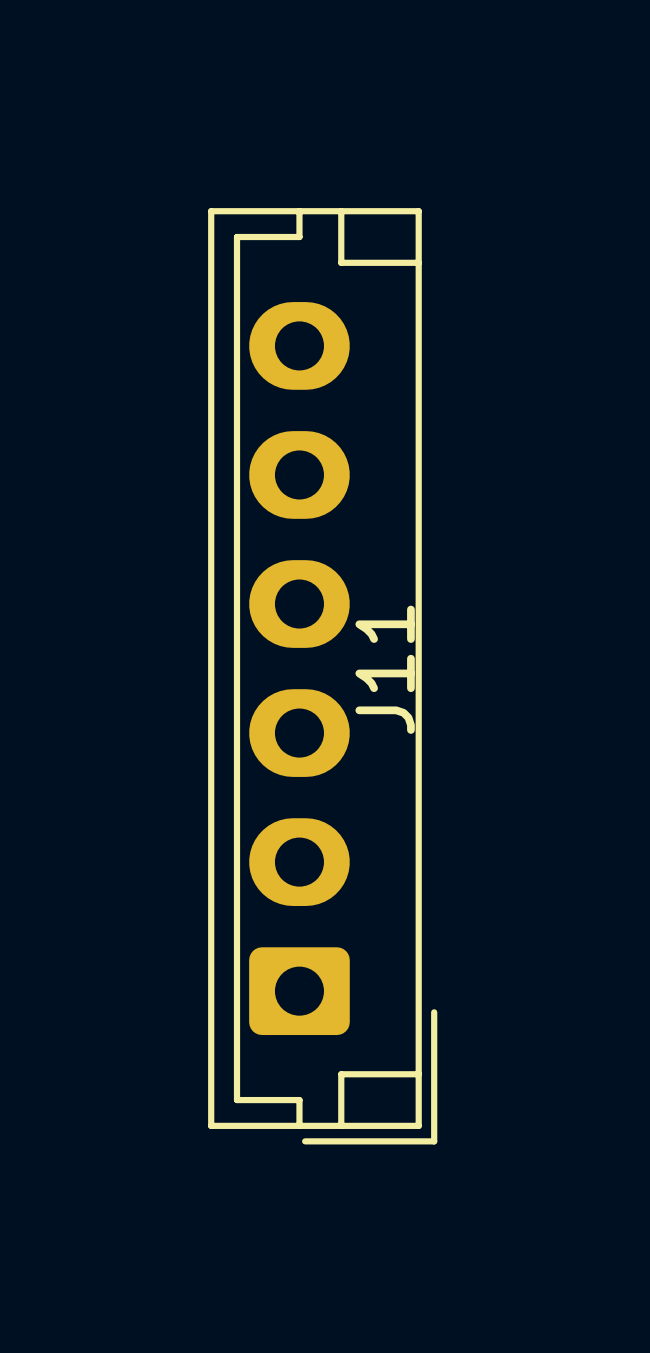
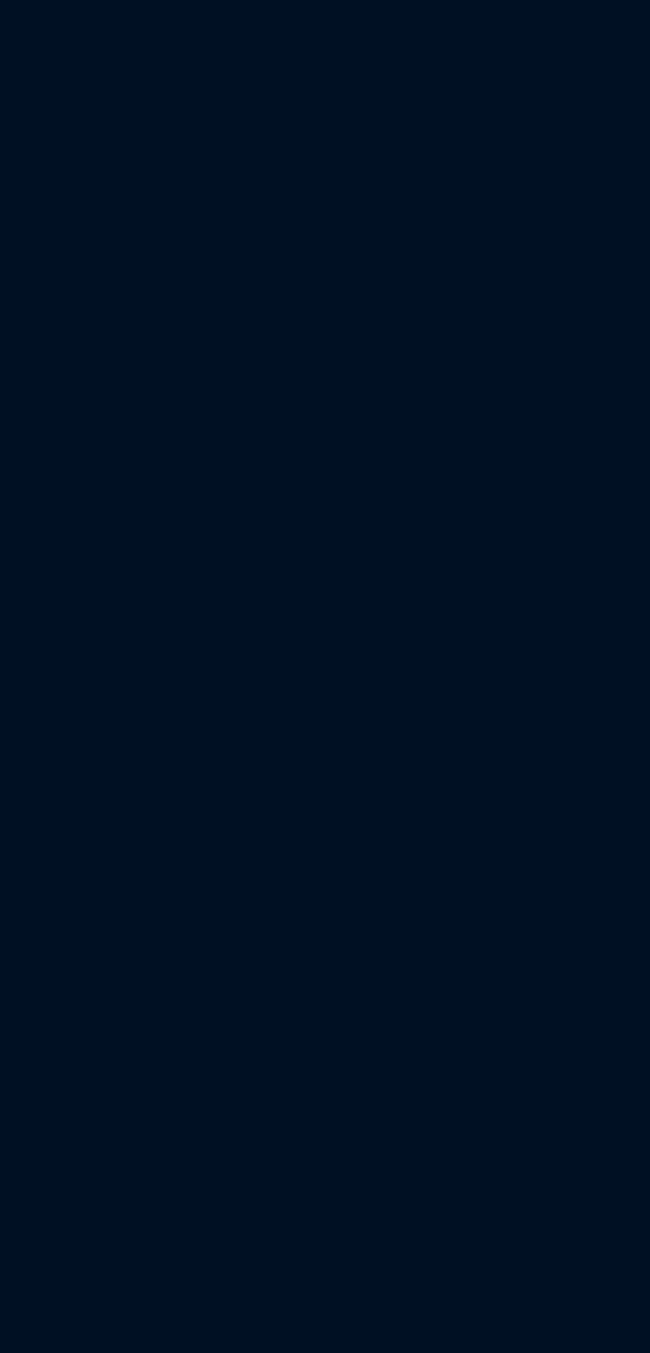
J11: (322, 676) -> none

